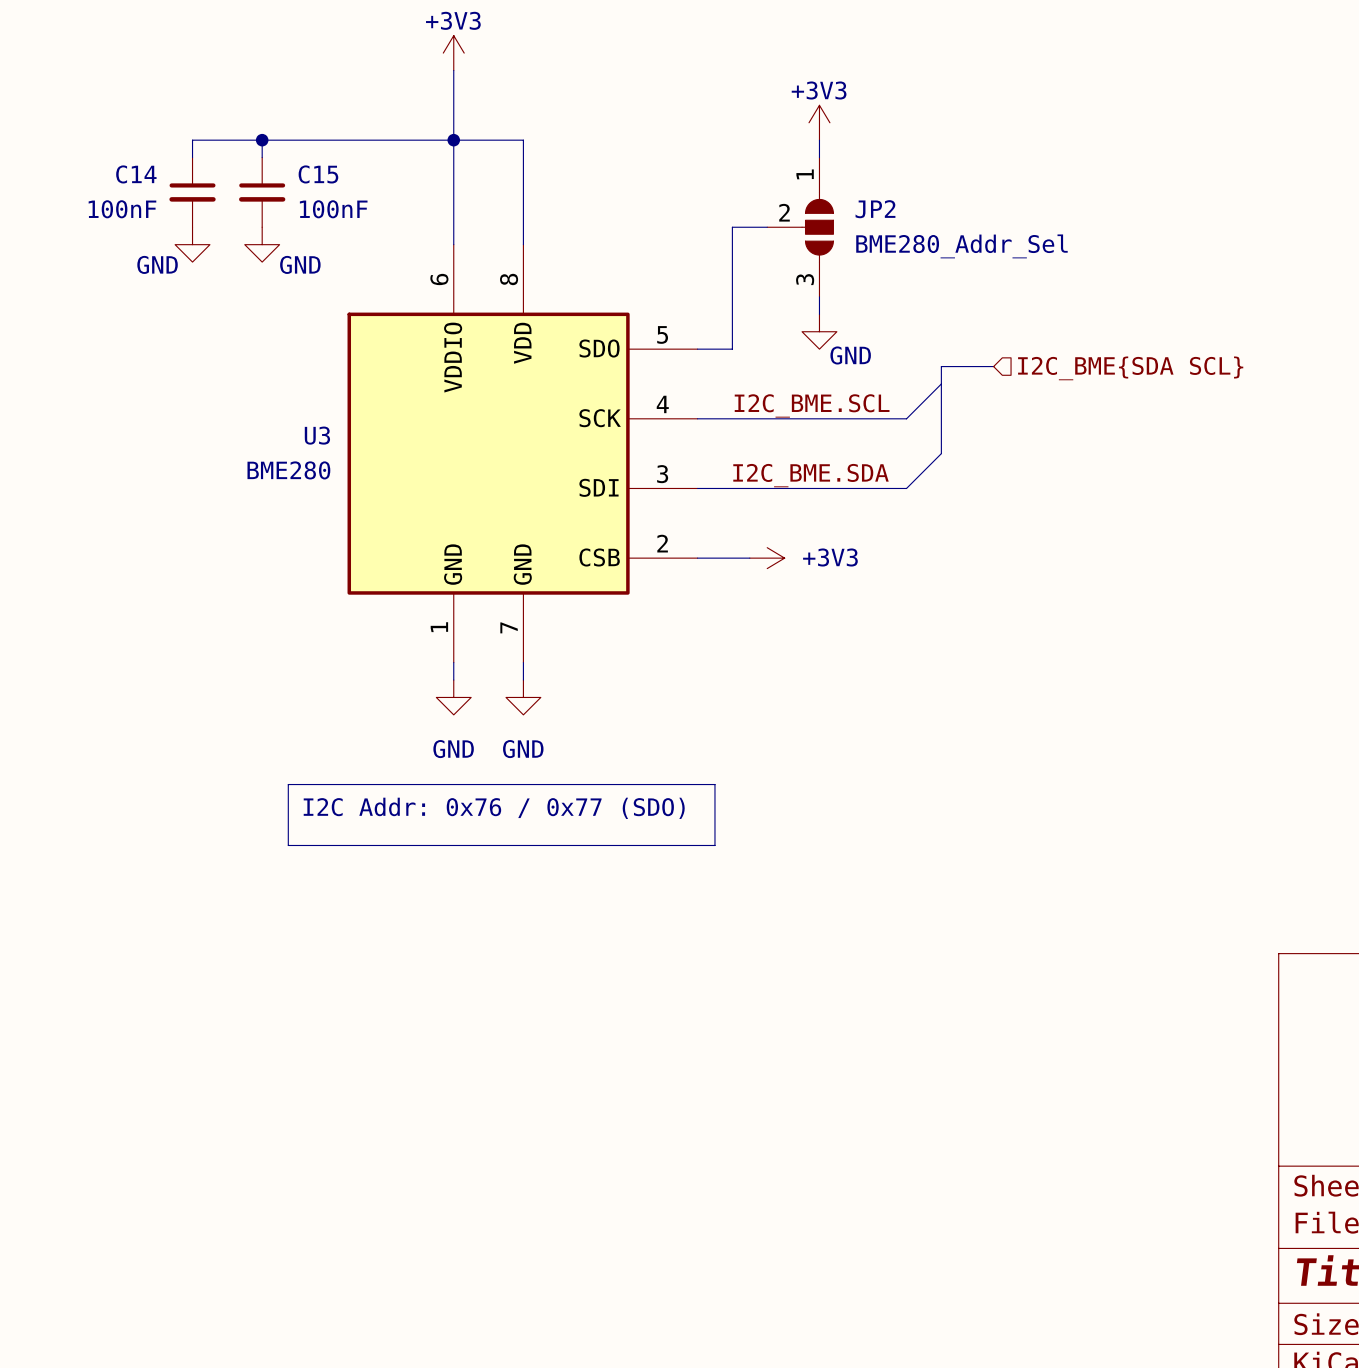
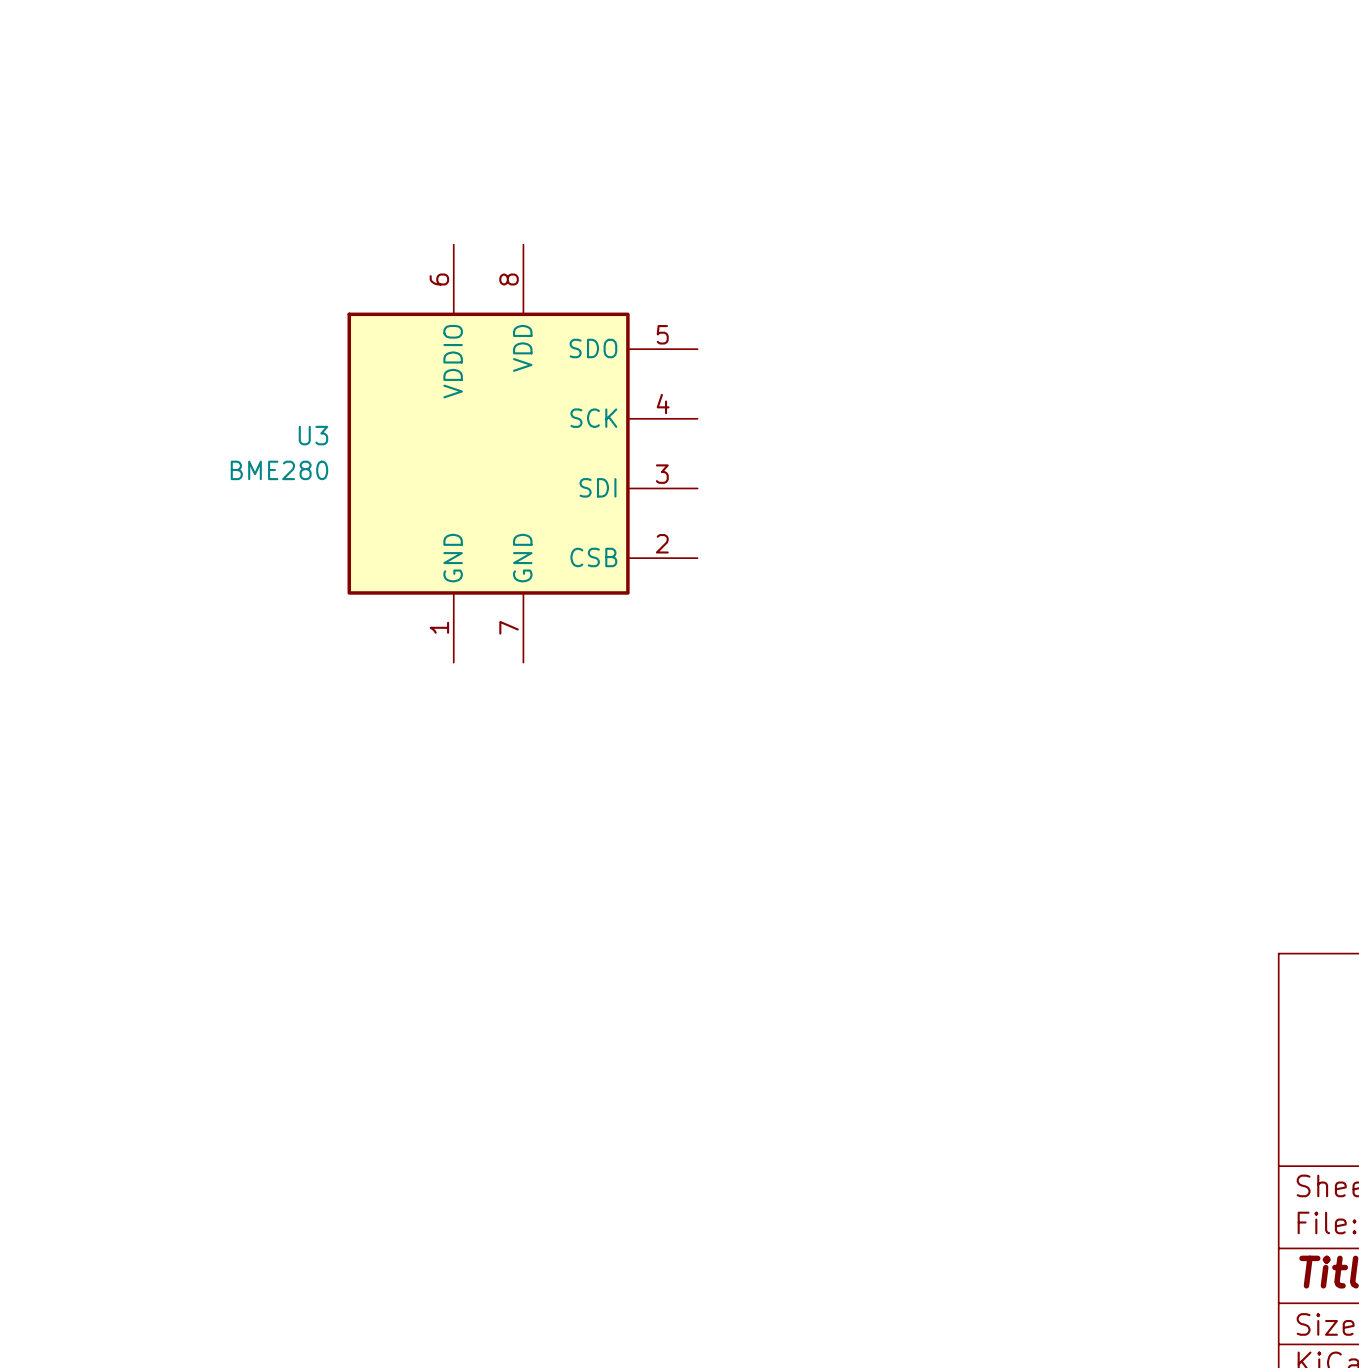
power symbol: +3V3 (453, 53) -> none
wire: (453, 70) (453, 244) -> none
power symbol: +3V3 (819, 122) -> none
wire: (262, 140) (262, 157) -> none
junction: (262, 140) -> none
junction: (453, 140) -> none
wire: (819, 140) (819, 157) -> none
wire: (192, 157) (192, 140) (523, 140) (523, 244) -> none
C14: 100nF (192, 192) -> none
C15: 100nF (262, 192) -> none
wire: (767, 227) (732, 227) (732, 349) (697, 349) -> none
JP2: BME280_Addr_Sel (800, 227) -> none
power symbol: GND (192, 244) -> none
power symbol: GND (262, 244) -> none
wire: (819, 296) (819, 314) -> none
power symbol: GND (819, 331) -> none
bus: (993, 366) (941, 366) (941, 453) -> none
hierarchical label: I2C_BME{SDA SCL} (1130, 368) -> none
wire: (941, 383) (906, 418) (697, 418) -> none
label: I2C_BME.SCL (812, 405) -> none
wire: (941, 453) (906, 488) (697, 488) -> none
label: I2C_BME.SDA (810, 475) -> none
wire: (697, 558) (749, 558) -> none
power symbol: +3V3 (767, 558) -> none
wire: (453, 662) (453, 680) -> none
wire: (523, 662) (523, 680) -> none
power symbol: GND (453, 697) -> none
power symbol: GND (523, 697) -> none
line: (288, 784) (714, 784) (714, 845) (288, 845) (288, 784) -> none
text: I2C Addr: 0x76 / 0x77 (SDO) (494, 808) -> none

